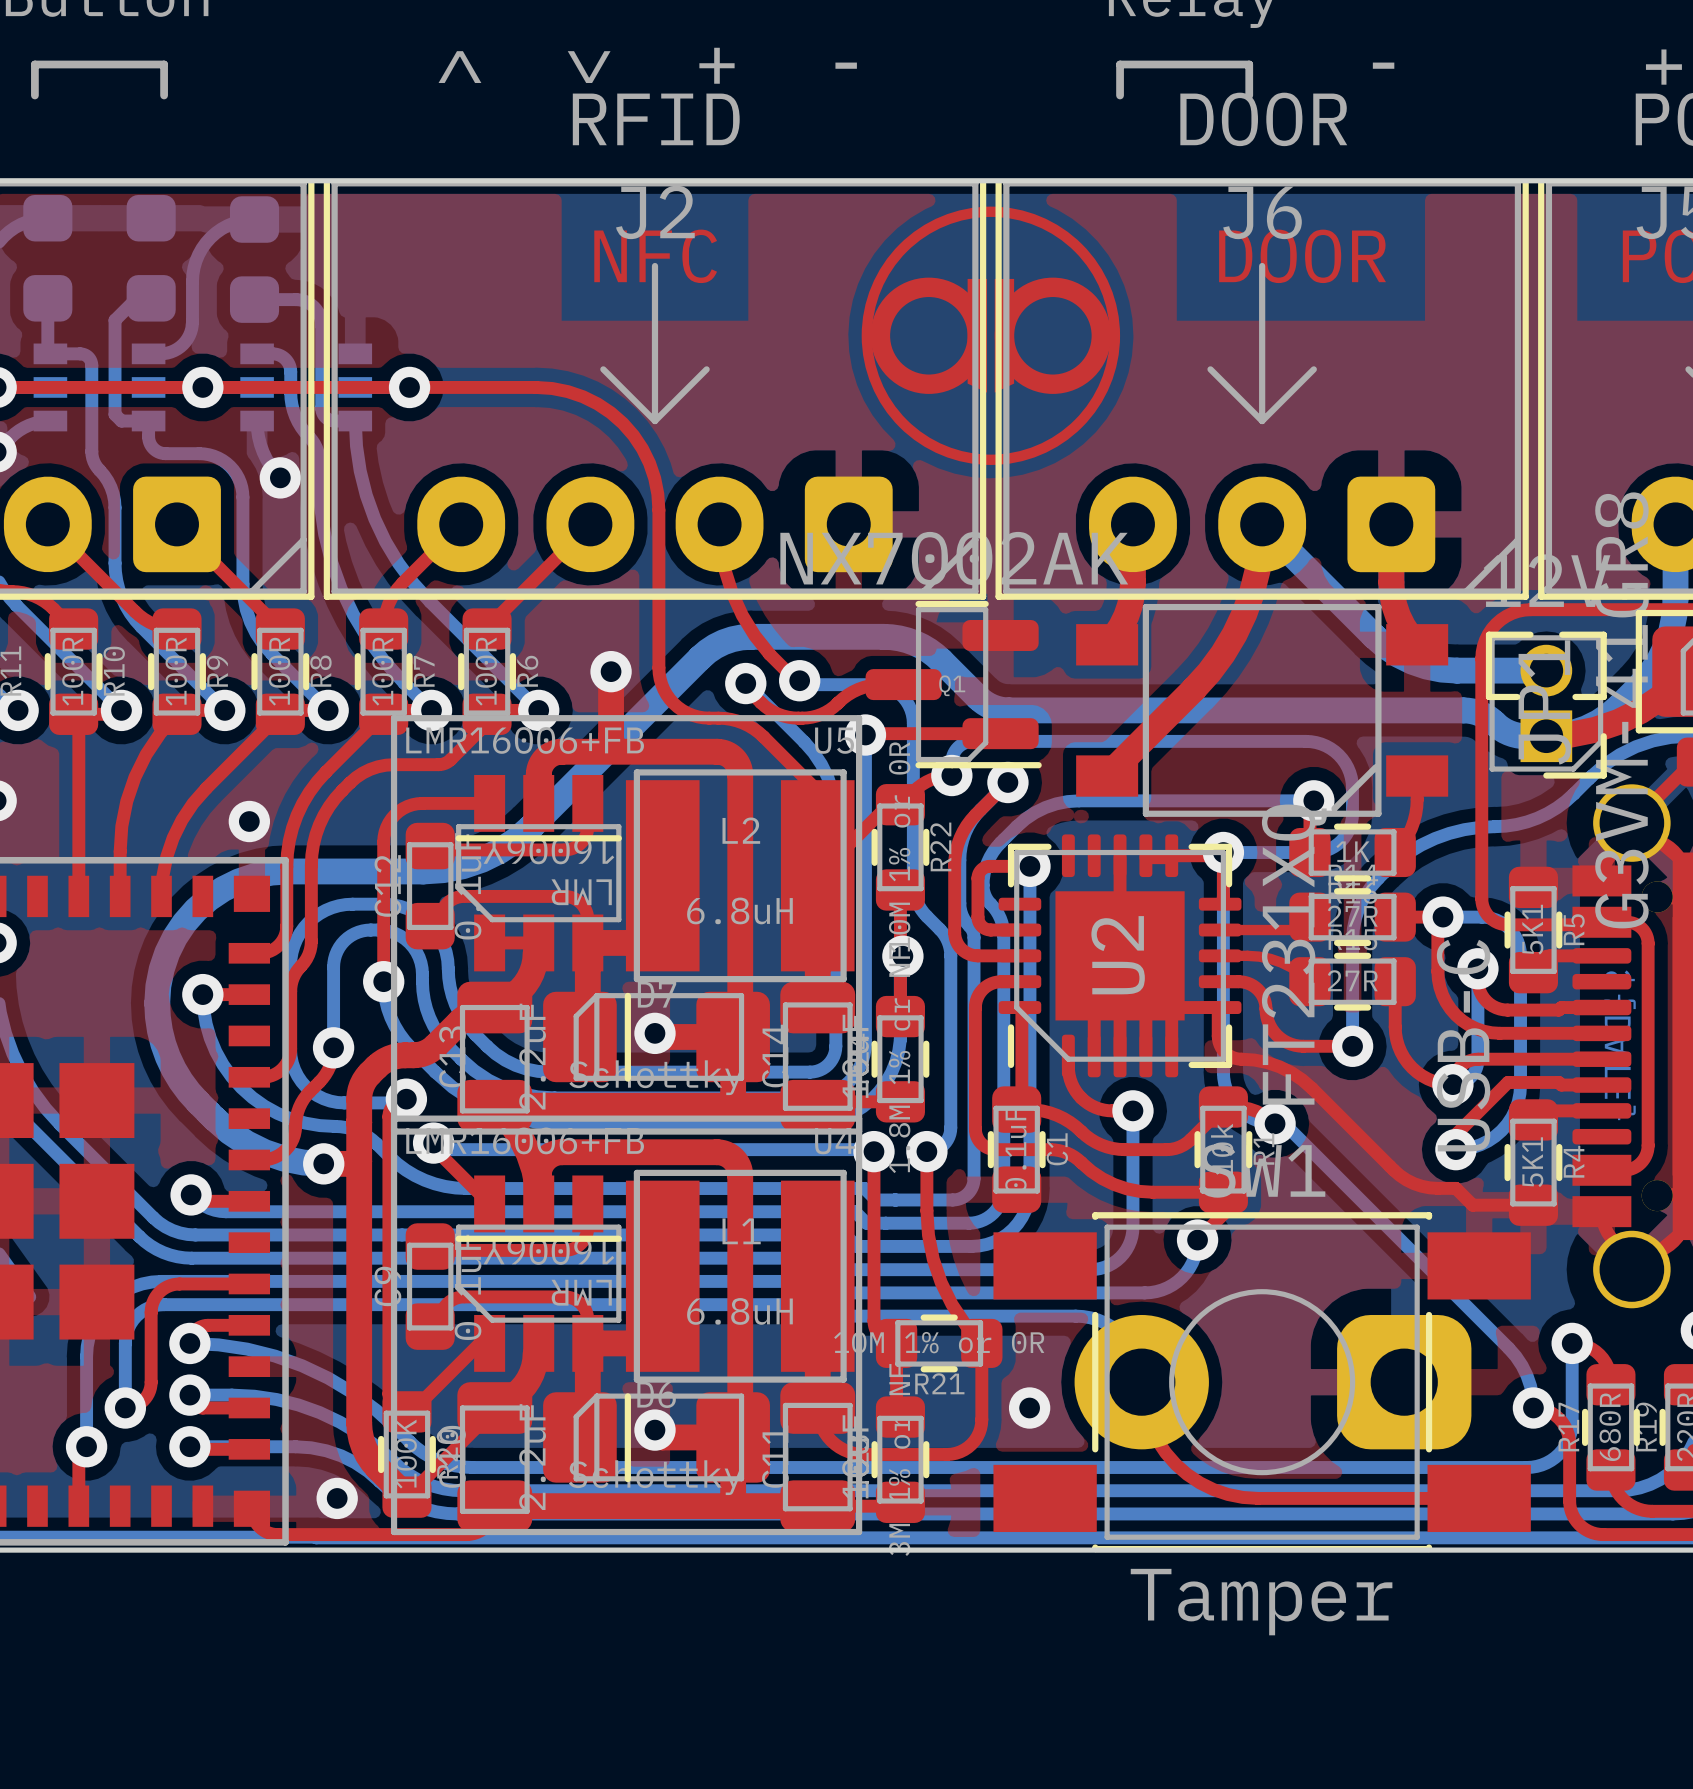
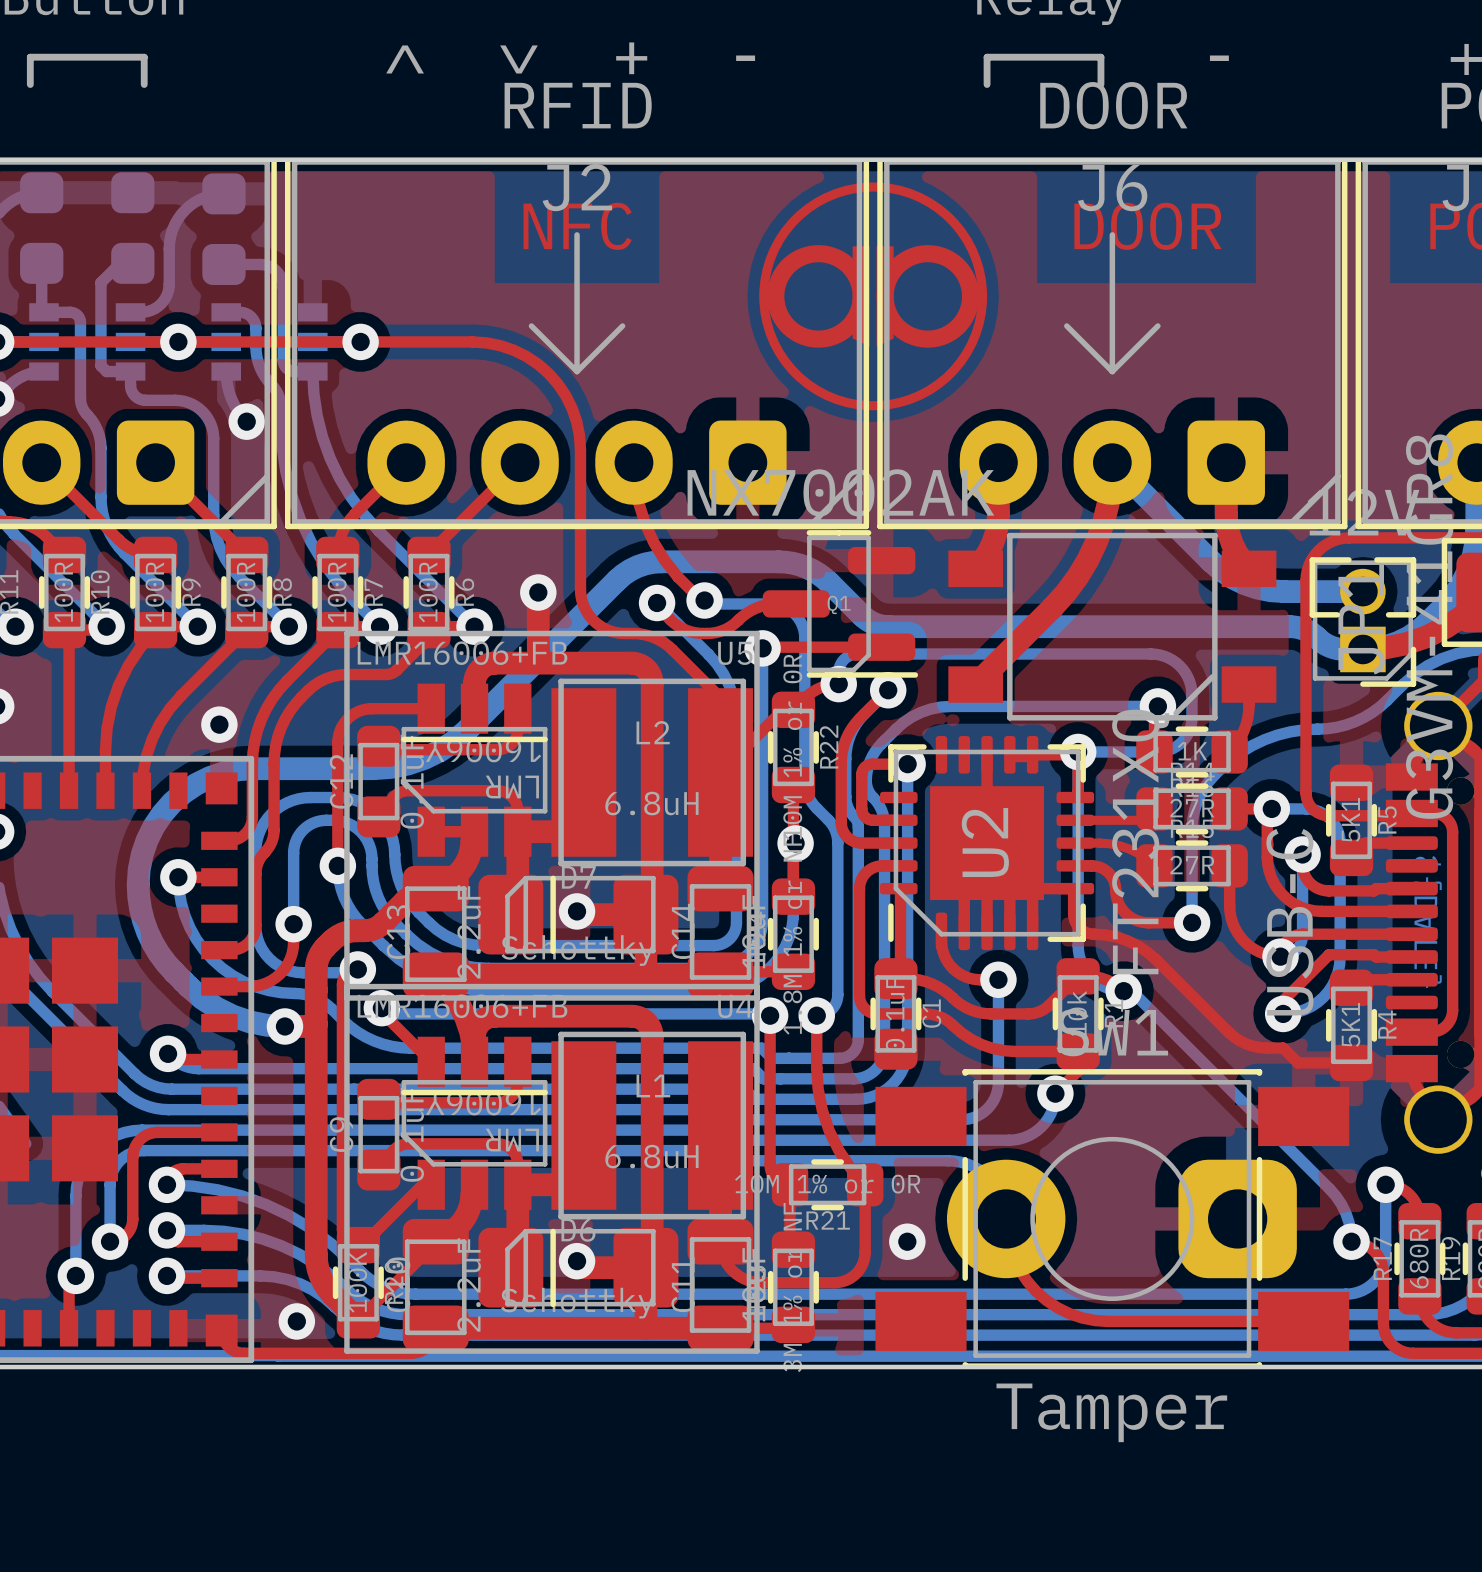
top track: (333, 1047) (327, 1070) (306, 1095) (299, 1107) (294, 1134) (288, 1146) (282, 1152) (270, 1158) (249, 1159) -> (293, 924) (292, 953) (284, 969) (276, 977) (266, 983) (254, 986) (219, 986)

